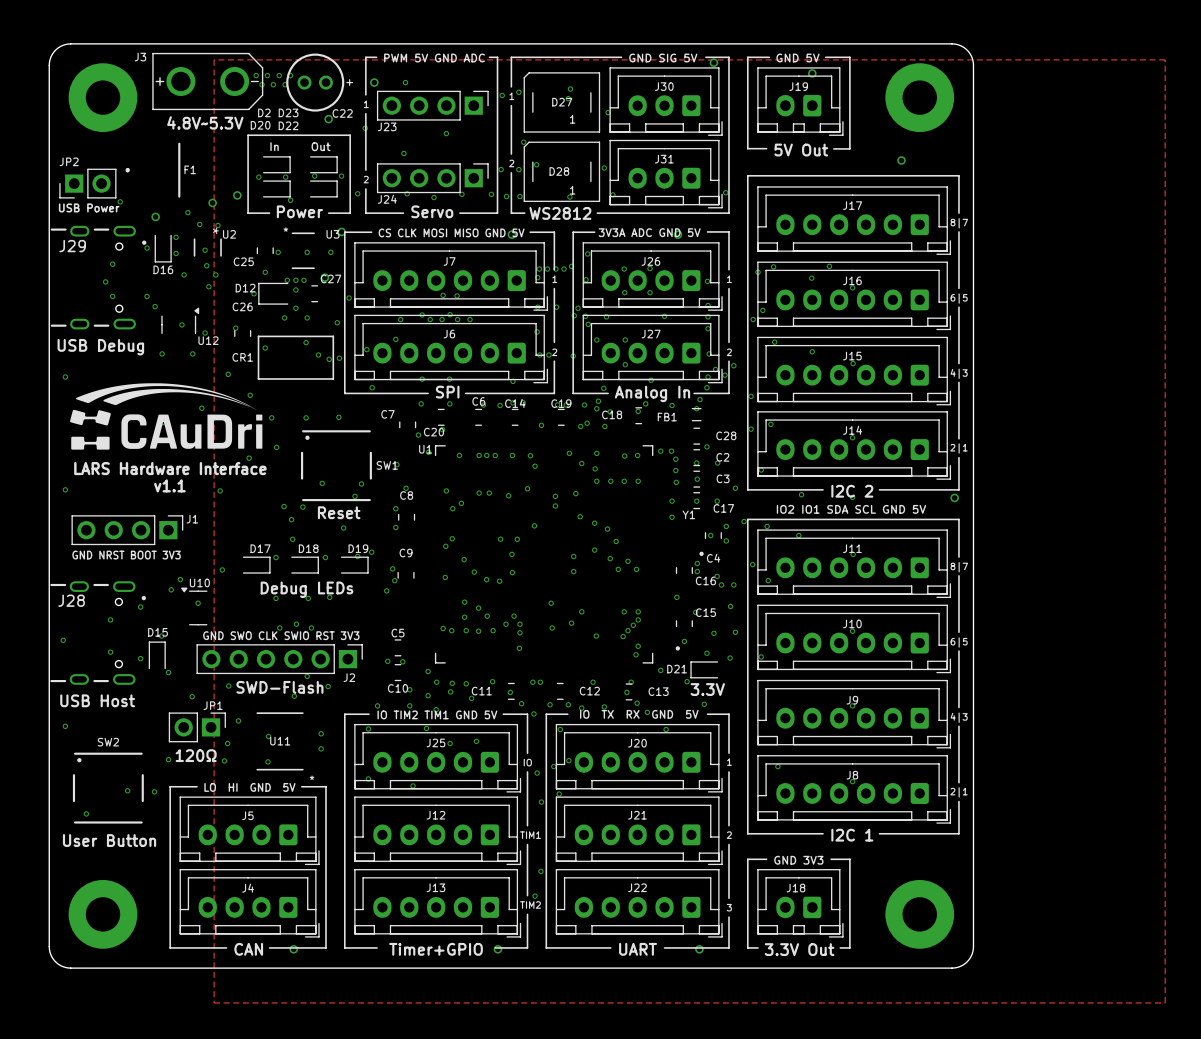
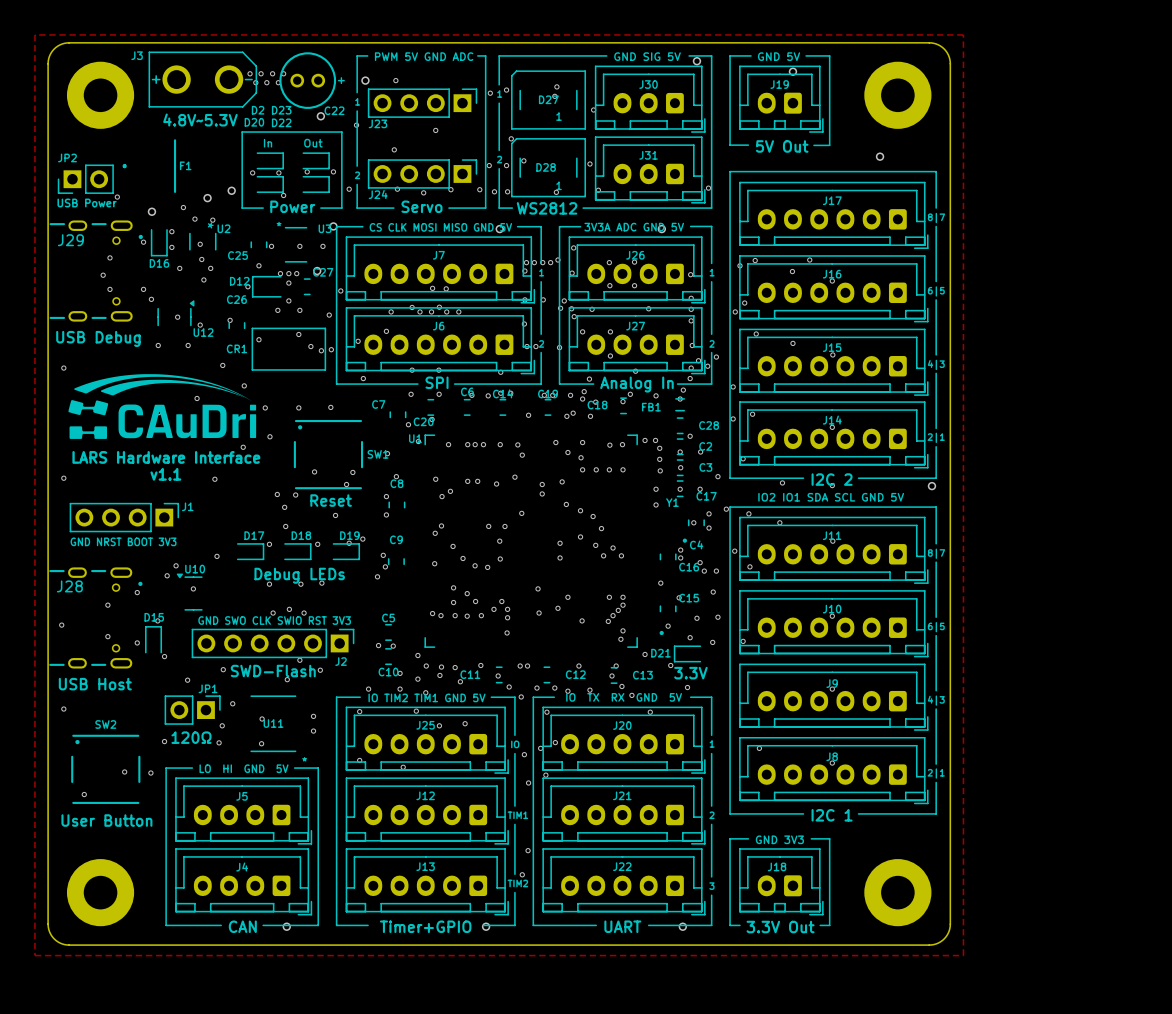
zone outline: (214, 59) (1165, 59) (1165, 1002) (214, 1002) (214, 59) -> (34, 34) (963, 34) (963, 955) (34, 955) (34, 34)

